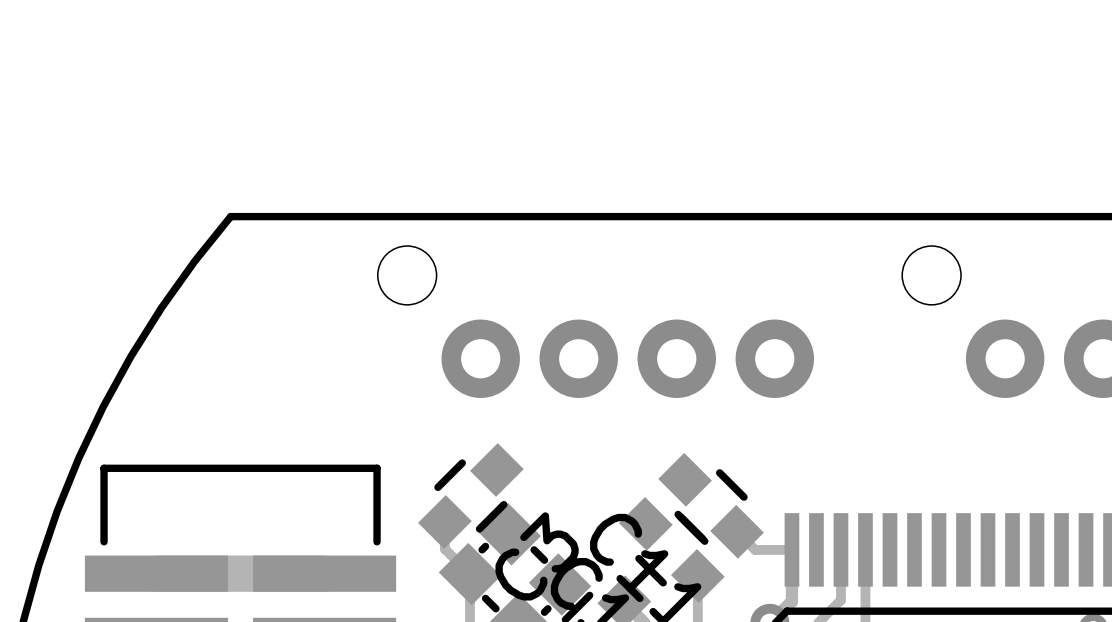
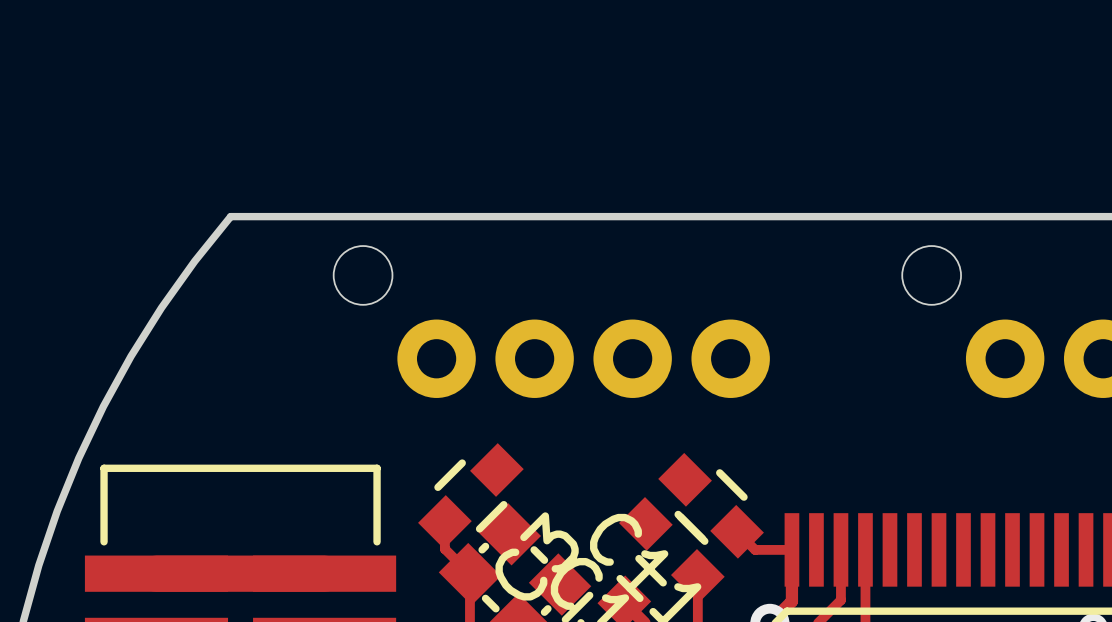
part position: (595, 321) -> (551, 321)

